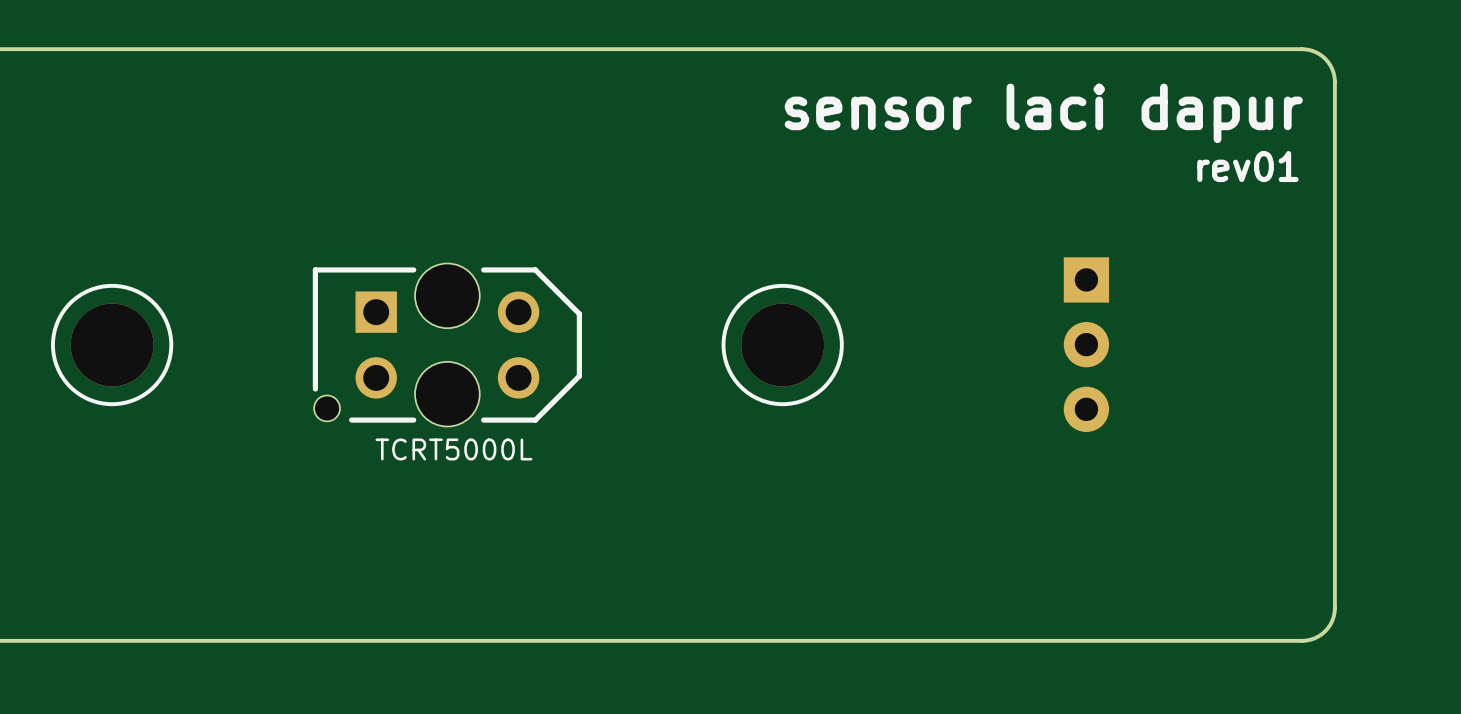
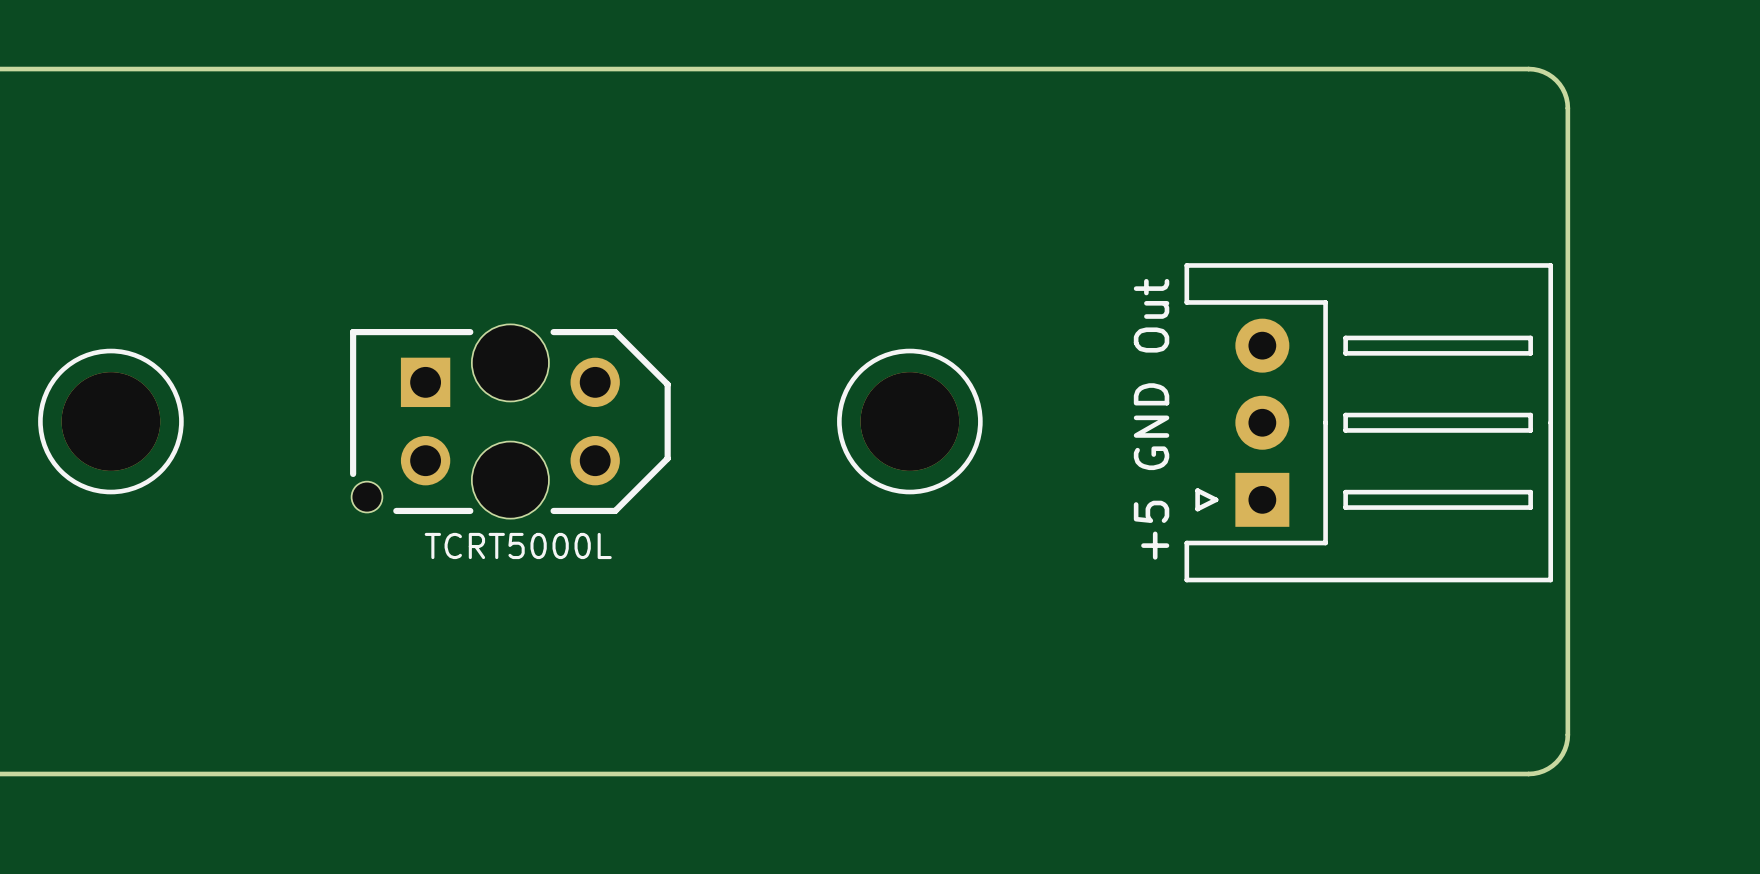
text: sensor laci dapur (1043, 113) -> none
text: rev01 (1247, 166) -> none
text: none -> +5 GND Out (1151, 419)
part: (1086, 344) -> none
part: none -> (1368, 422)

